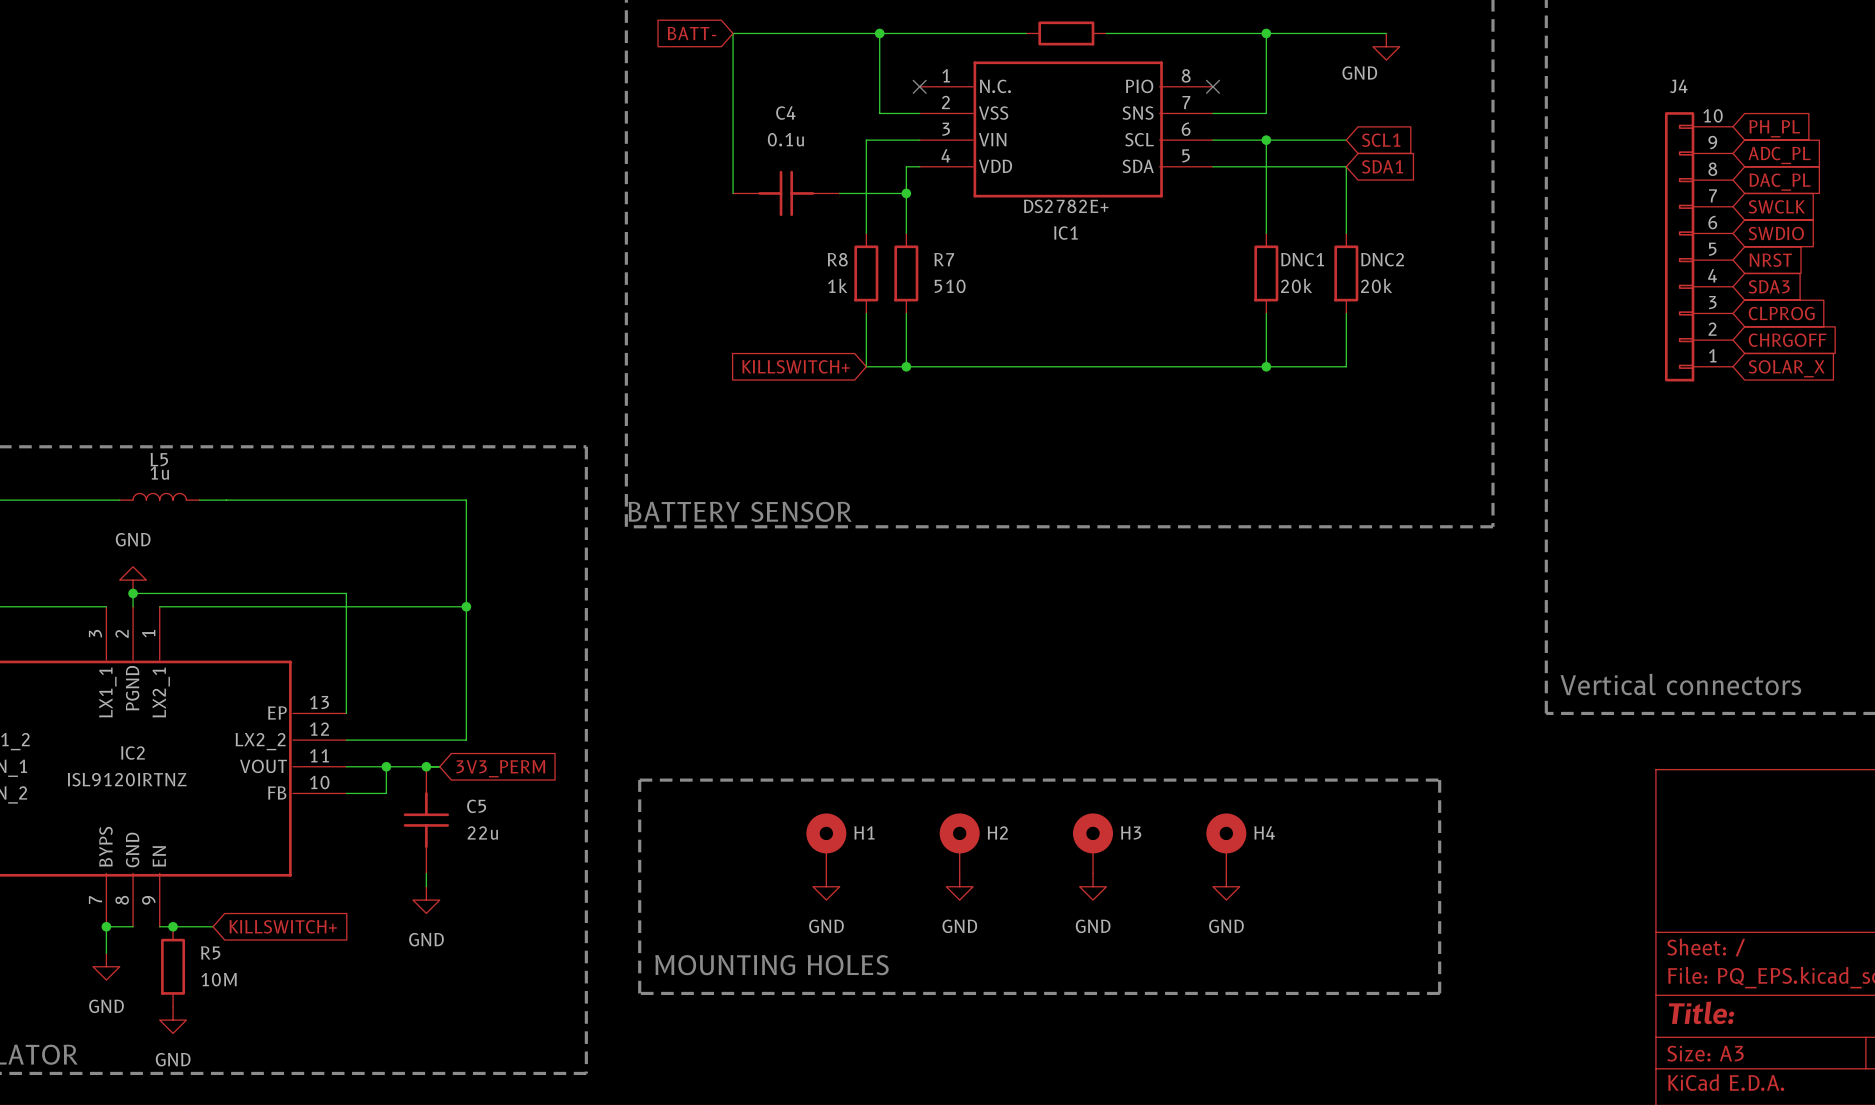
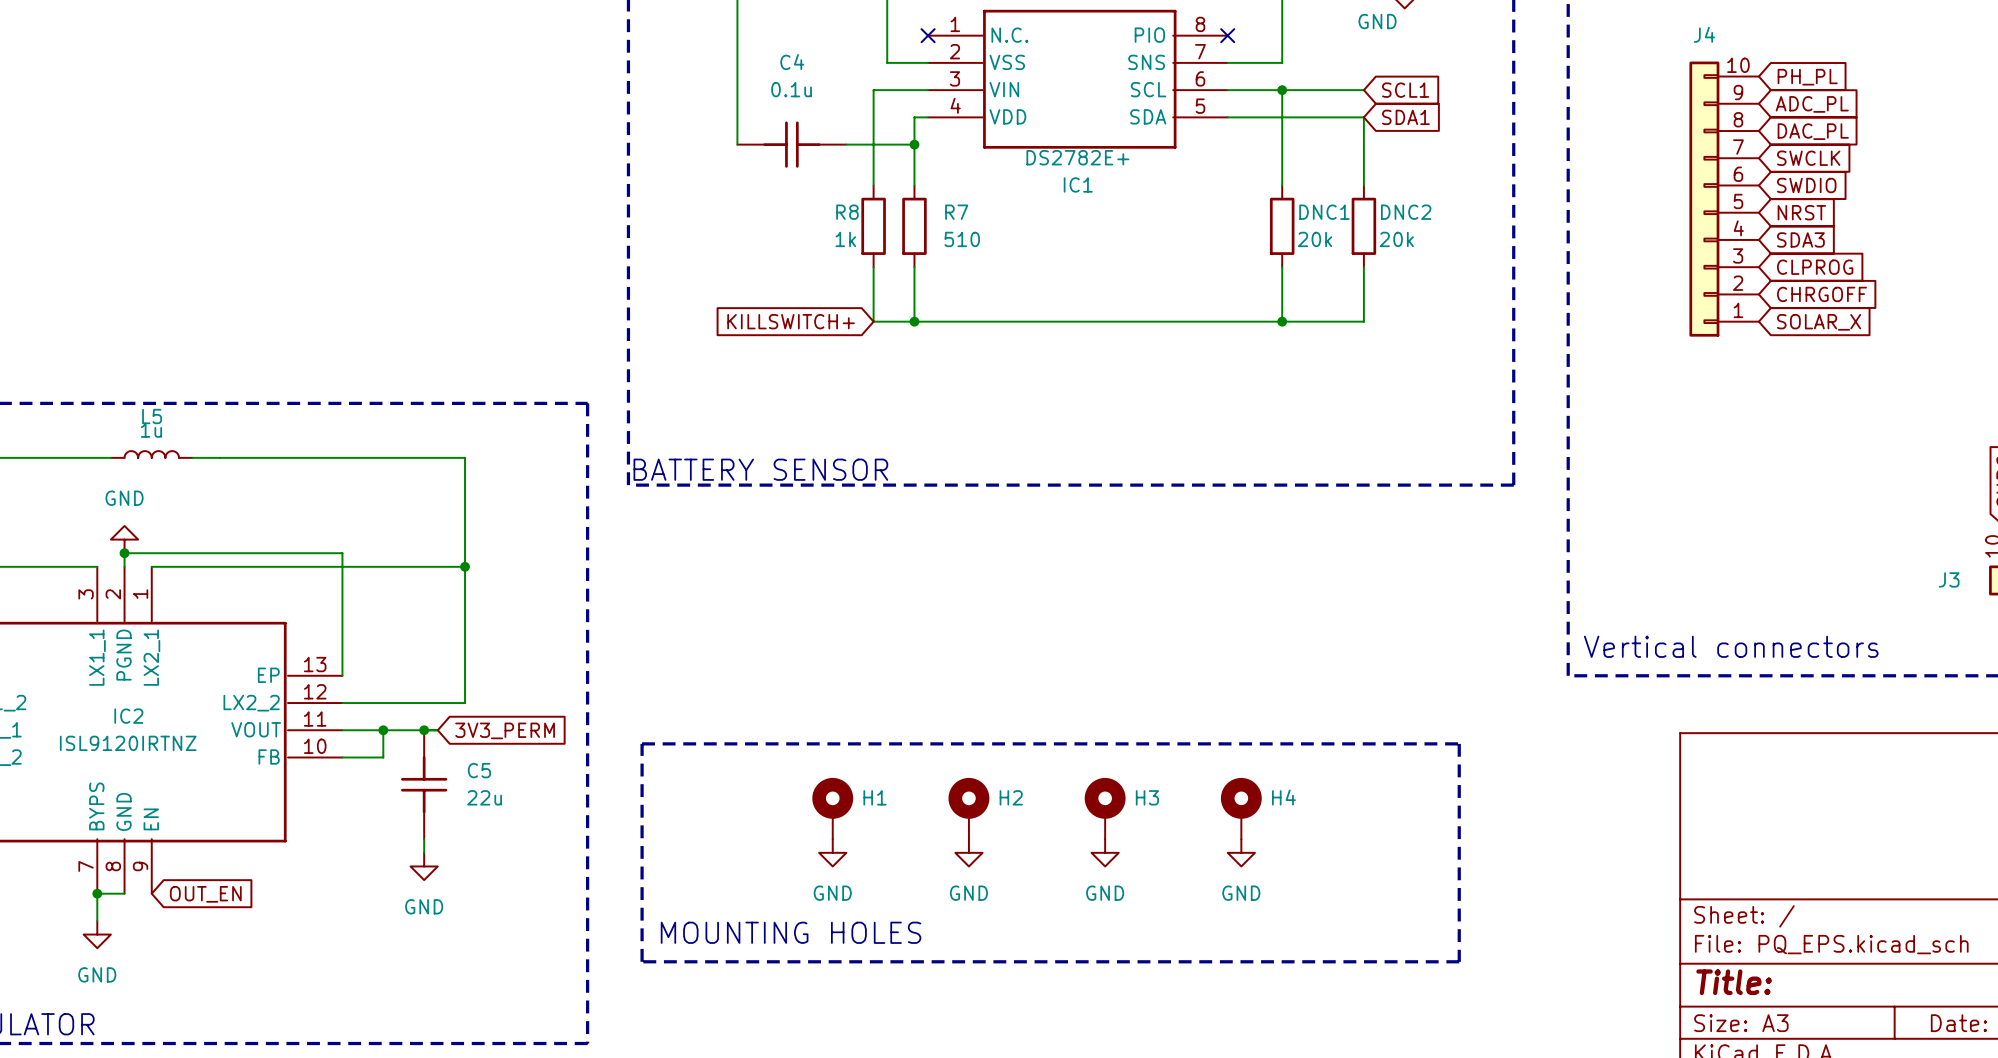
wire: (159, 926) (213, 926) -> none
junction: (173, 926) -> none
global label: KILLSWITCH+ (283, 926) -> none
global label: none -> OUT_EN (205, 894)
R5: 10M (173, 966) -> none
power symbol: GND (173, 1020) -> none

